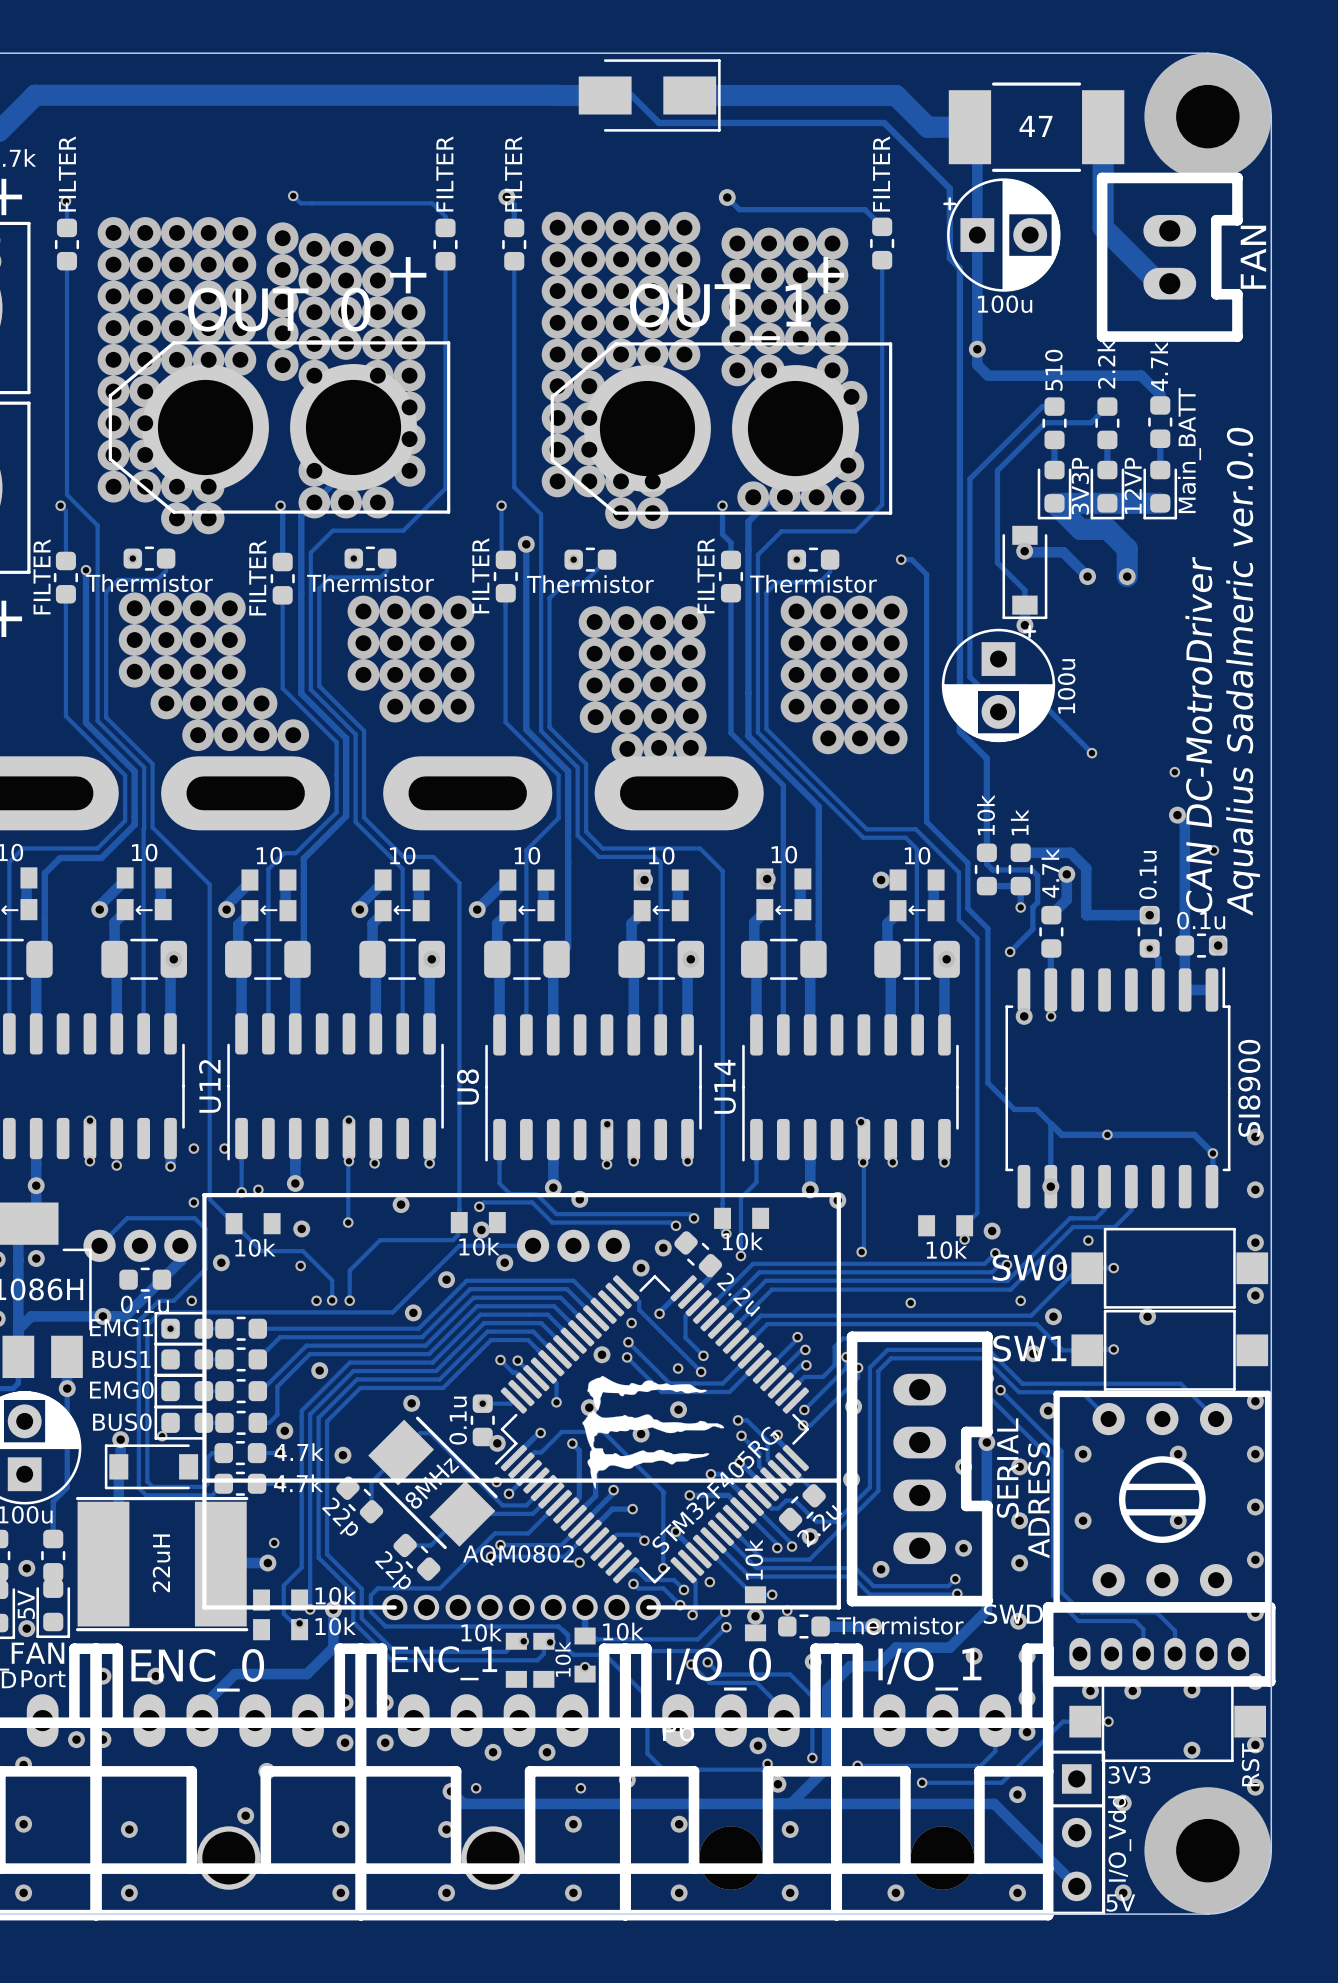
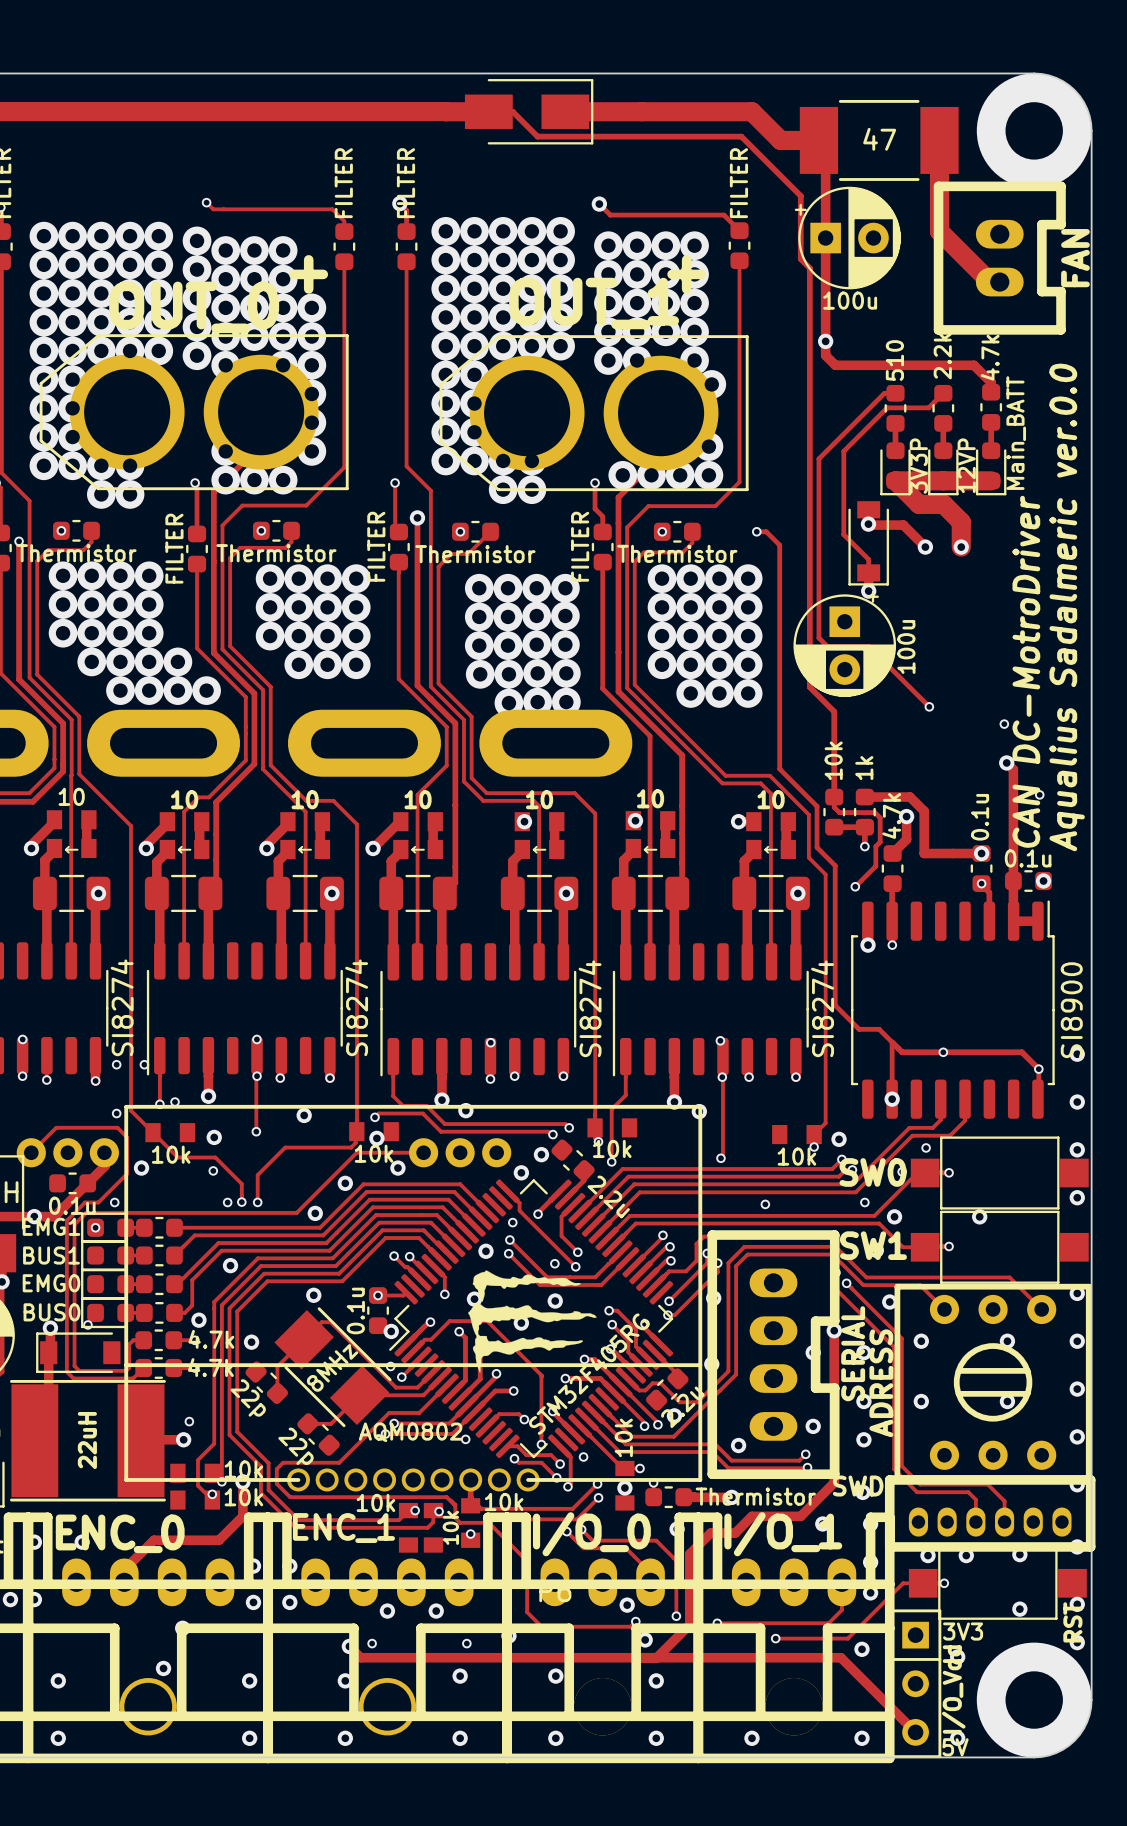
part value: none -> SI8274 (122, 1007)
U12 name: U12 (210, 1086) -> none
U12 value: none -> SI8274 (356, 1007)
U8 name: U8 (468, 1086) -> none
U14 name: U14 (725, 1086) -> none
U8 value: none -> SI8274 (590, 1008)
U14 value: none -> SI8274 (822, 1008)

